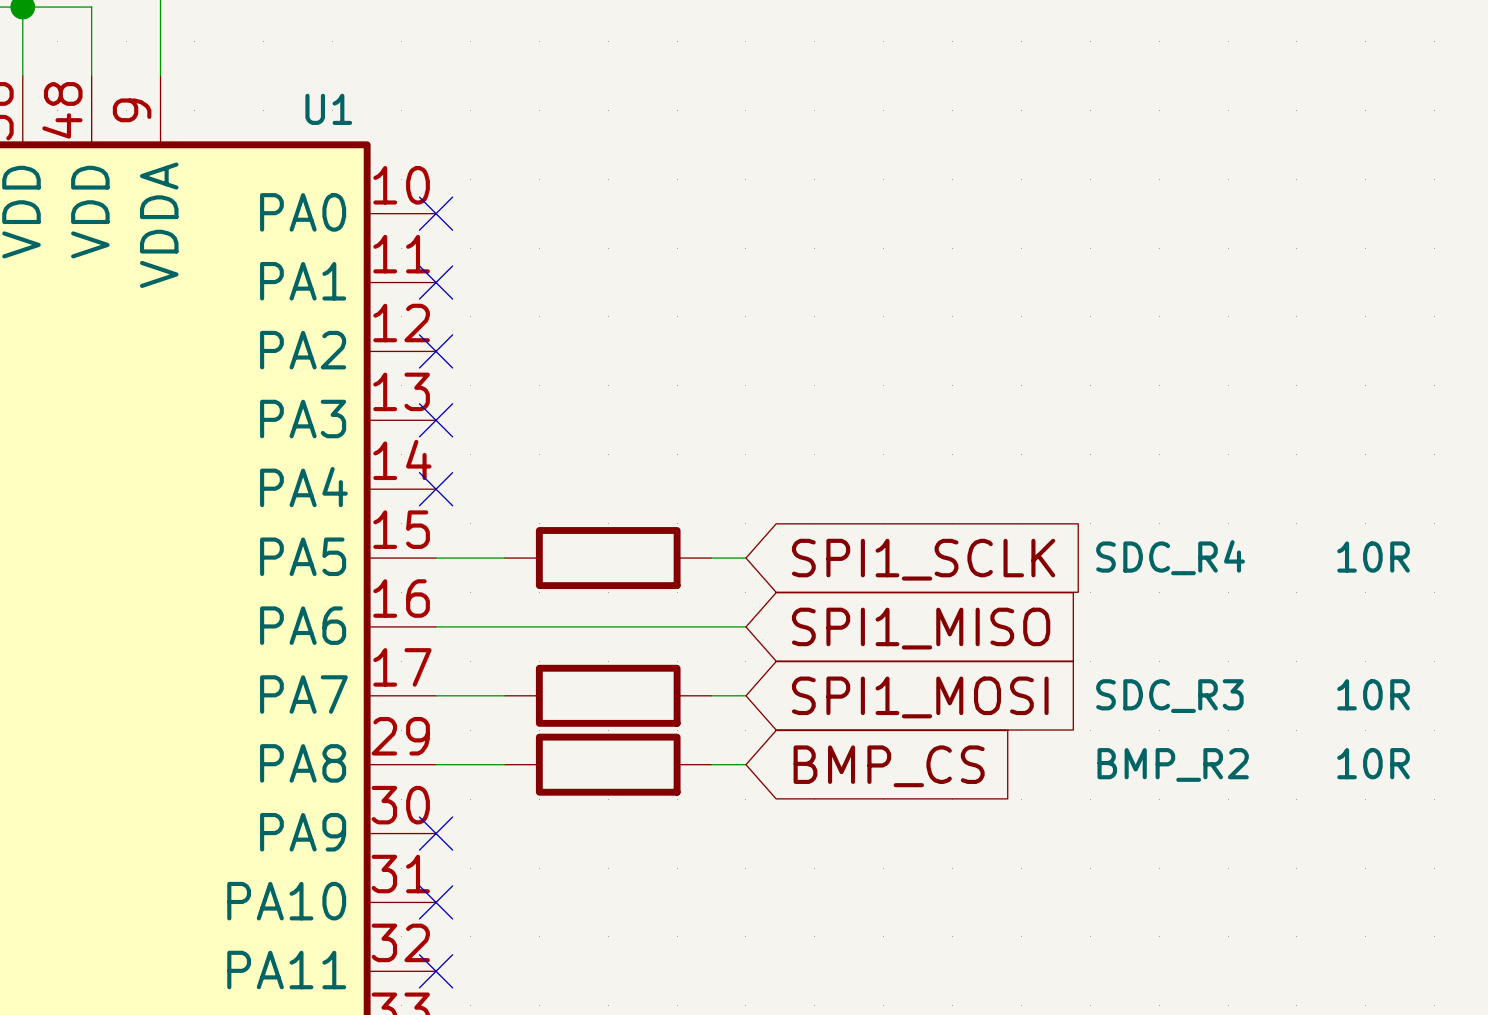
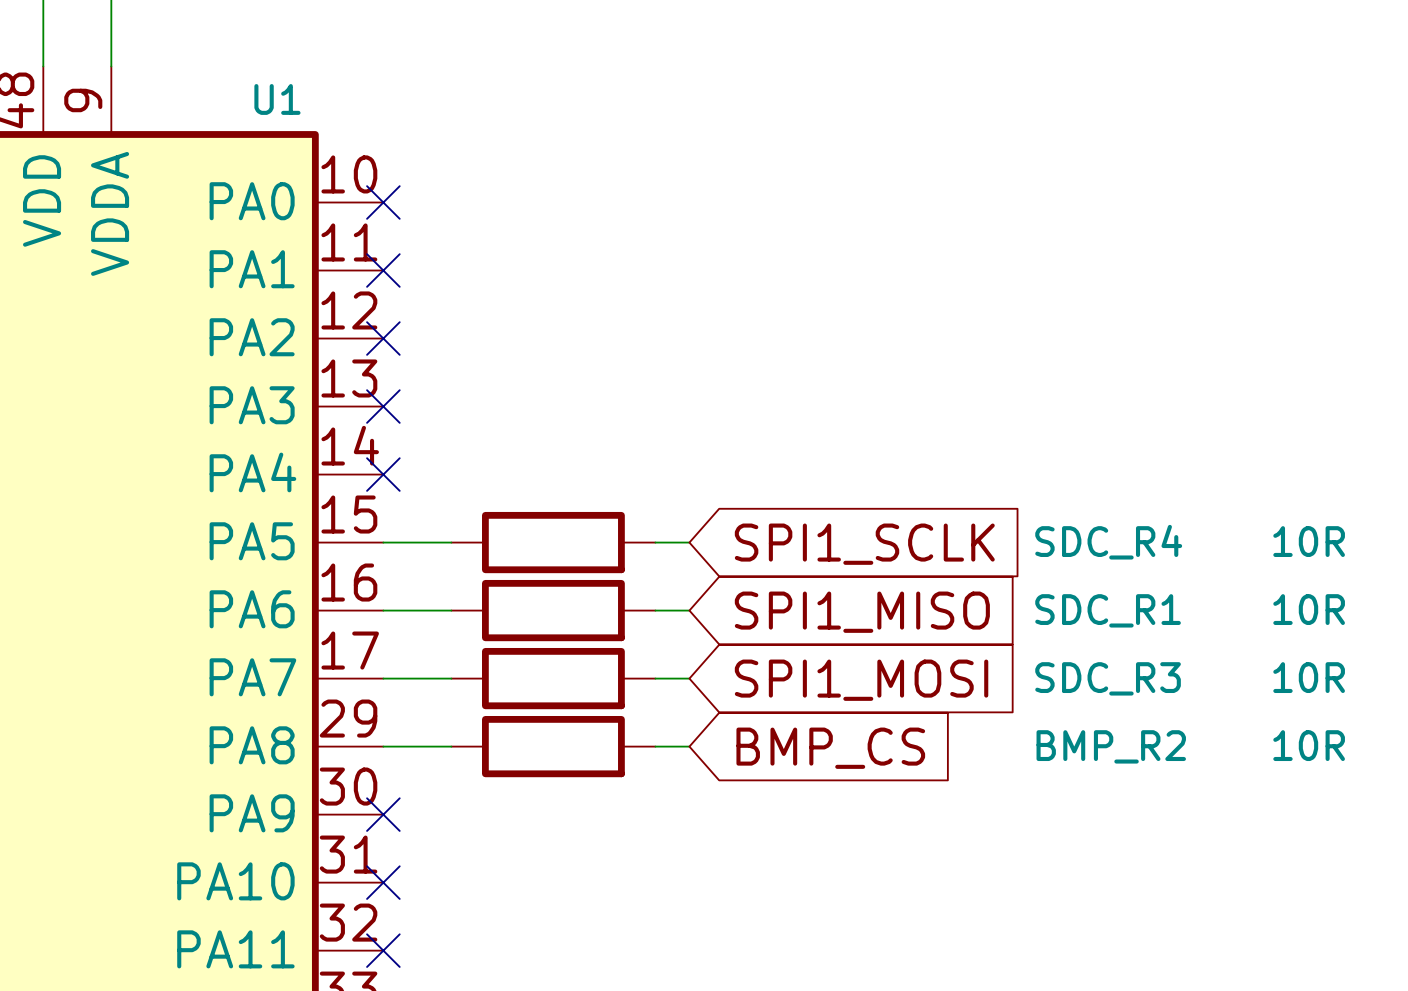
wire: (504, 626) (711, 626) -> none
SDC_R1: none -> 10R (553, 610)

